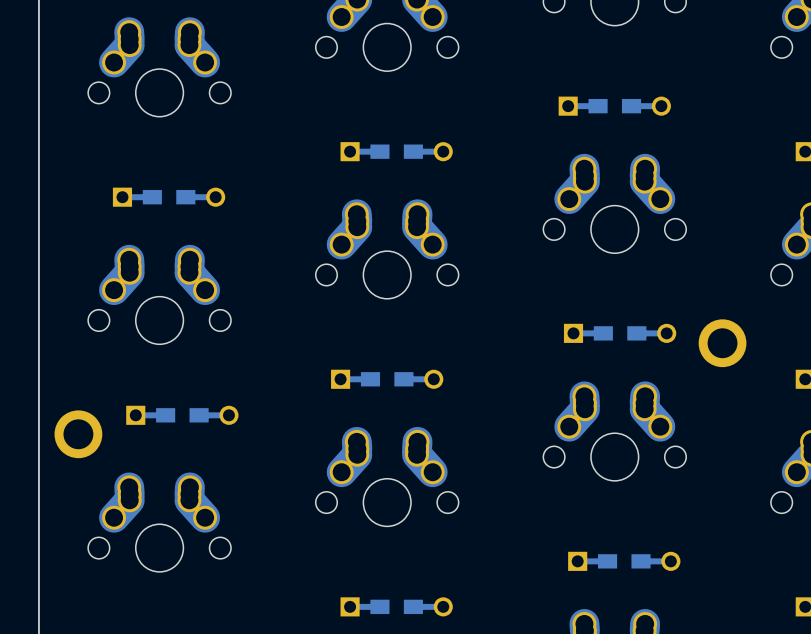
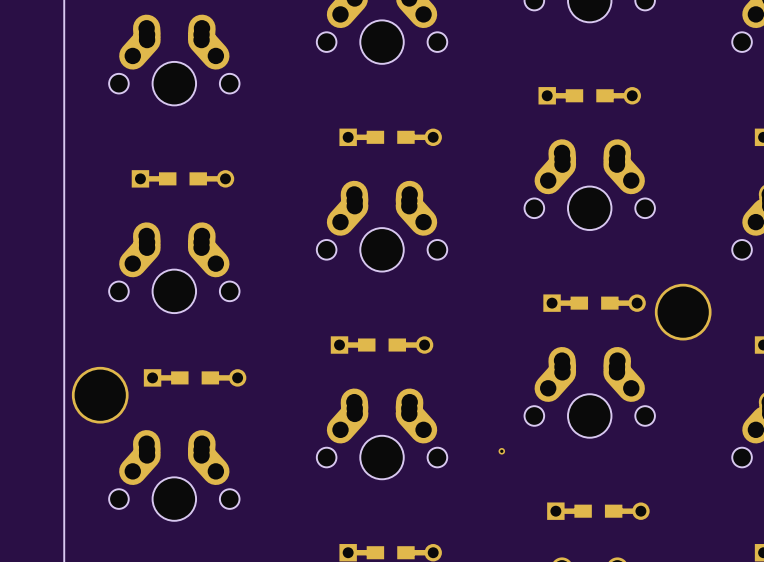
part footprint: [698, 319, 747, 368] -> [654, 283, 712, 341]
part footprint: [54, 410, 103, 459] -> [71, 366, 129, 424]
part: none -> (501, 451)

